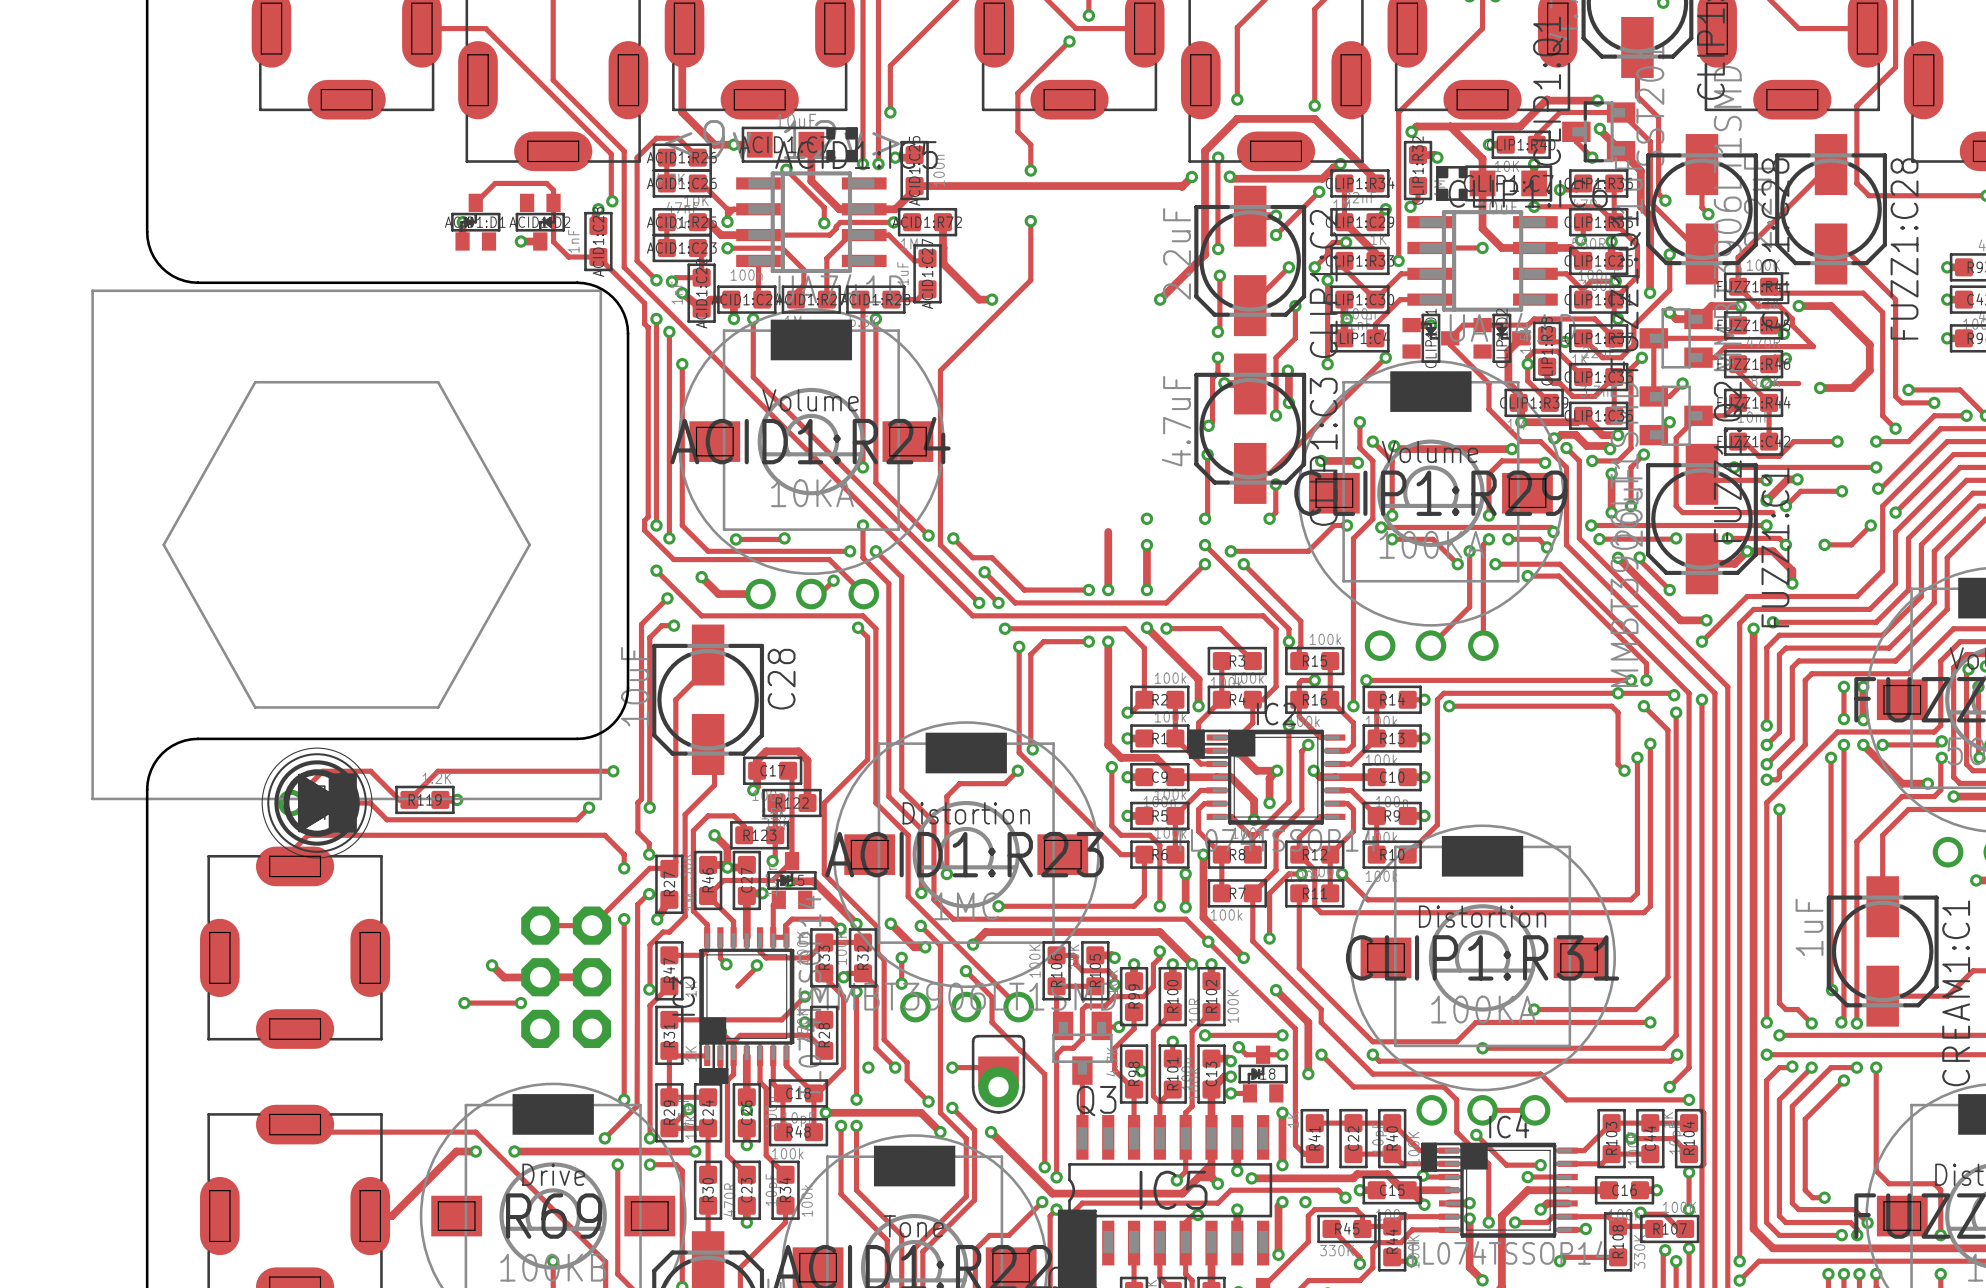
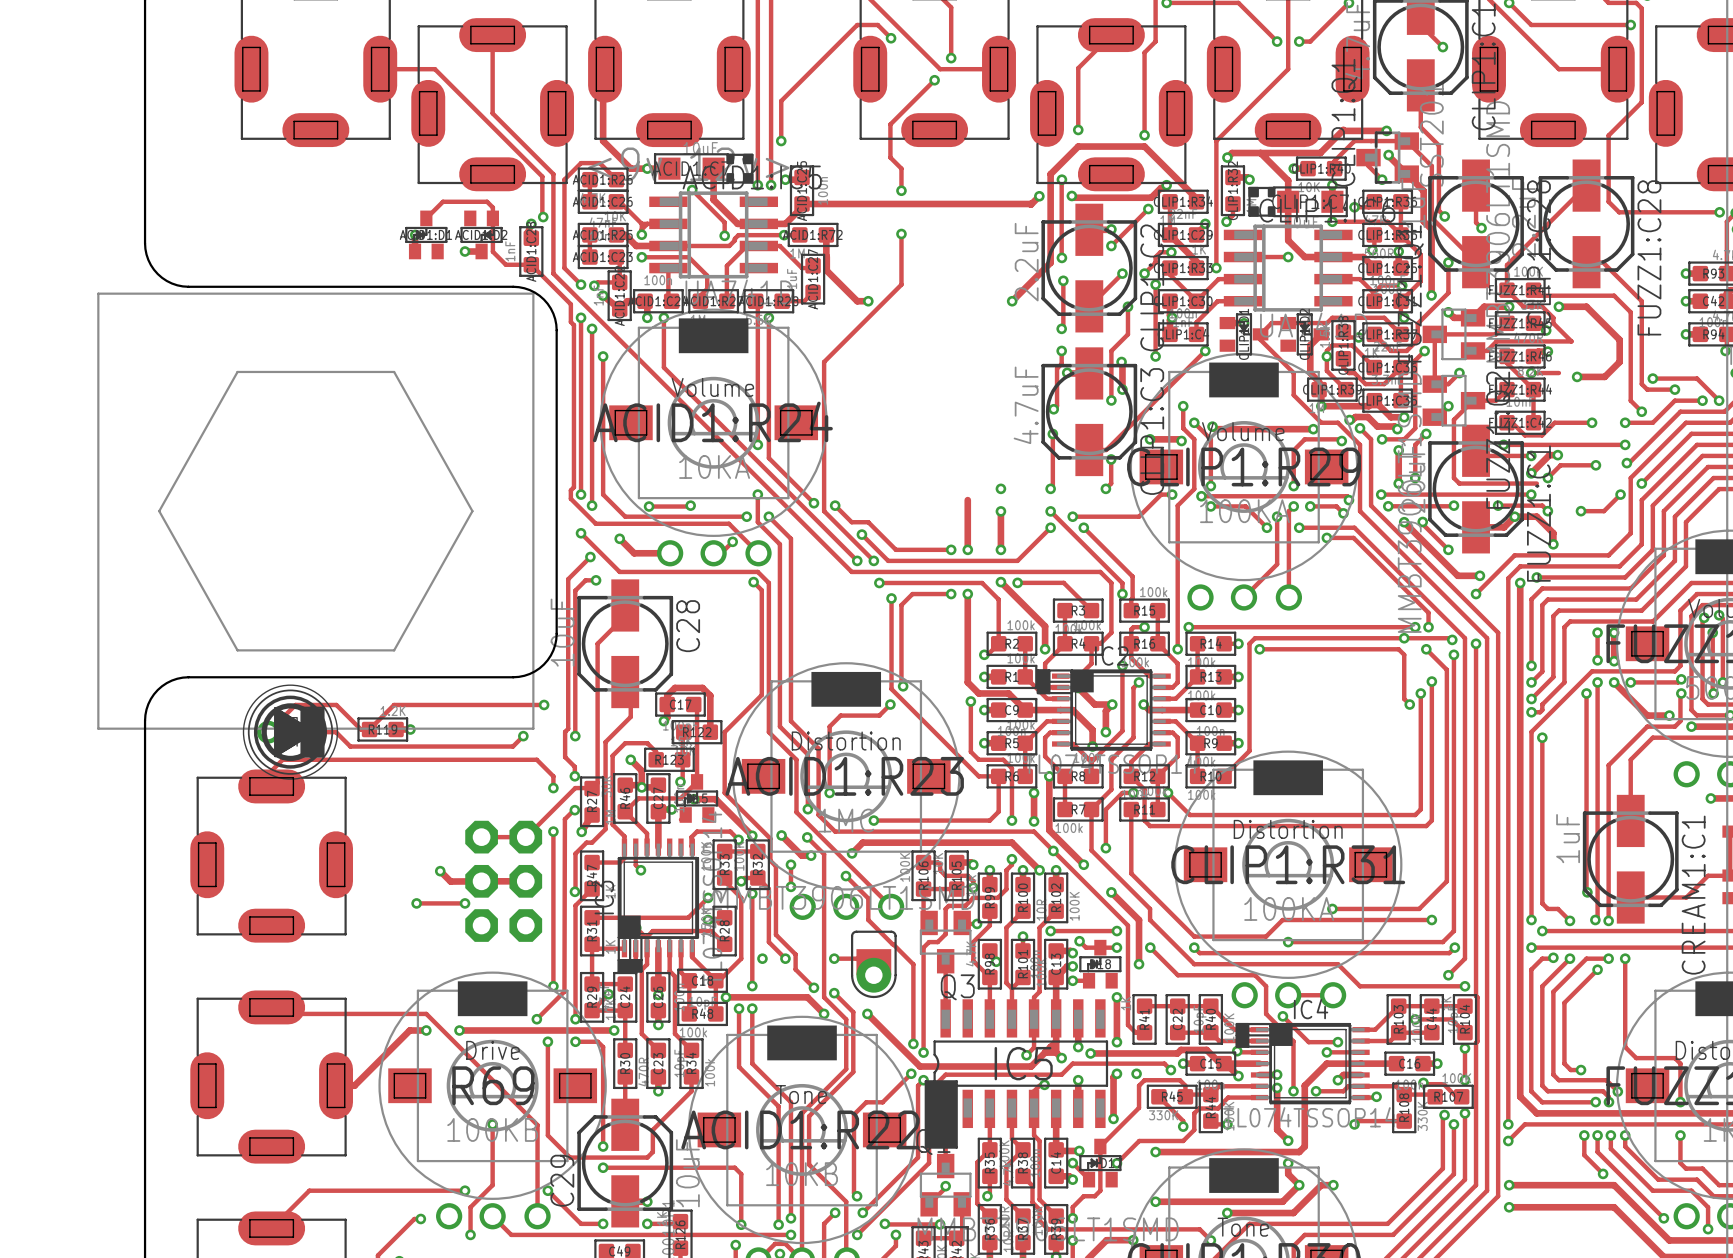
track: (773, 905) (773, 937) (786, 937) -> none
track: (760, 937) (760, 951) (766, 957) (808, 957) (824, 942) -> none
track: (756, 965) (737, 986) -> none
via: (756, 965) -> none

